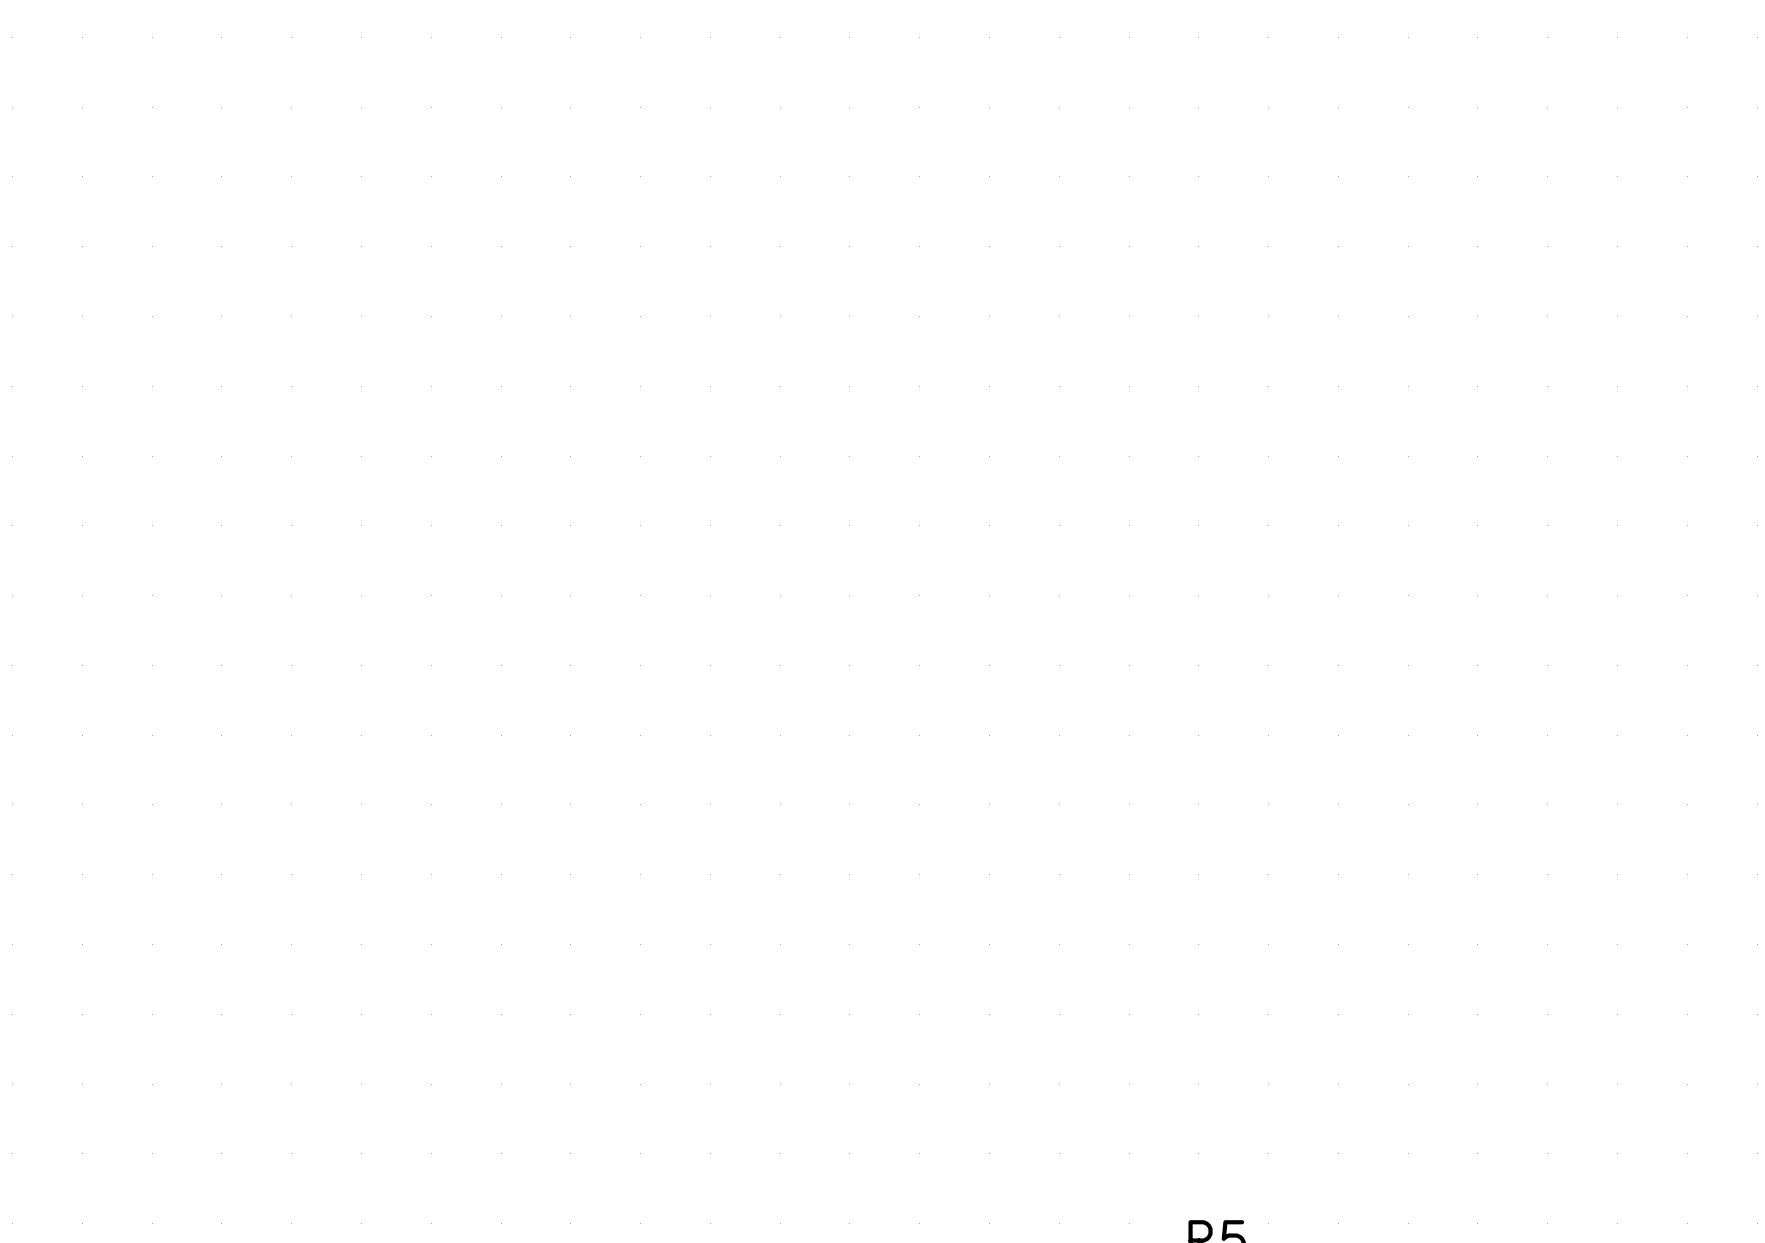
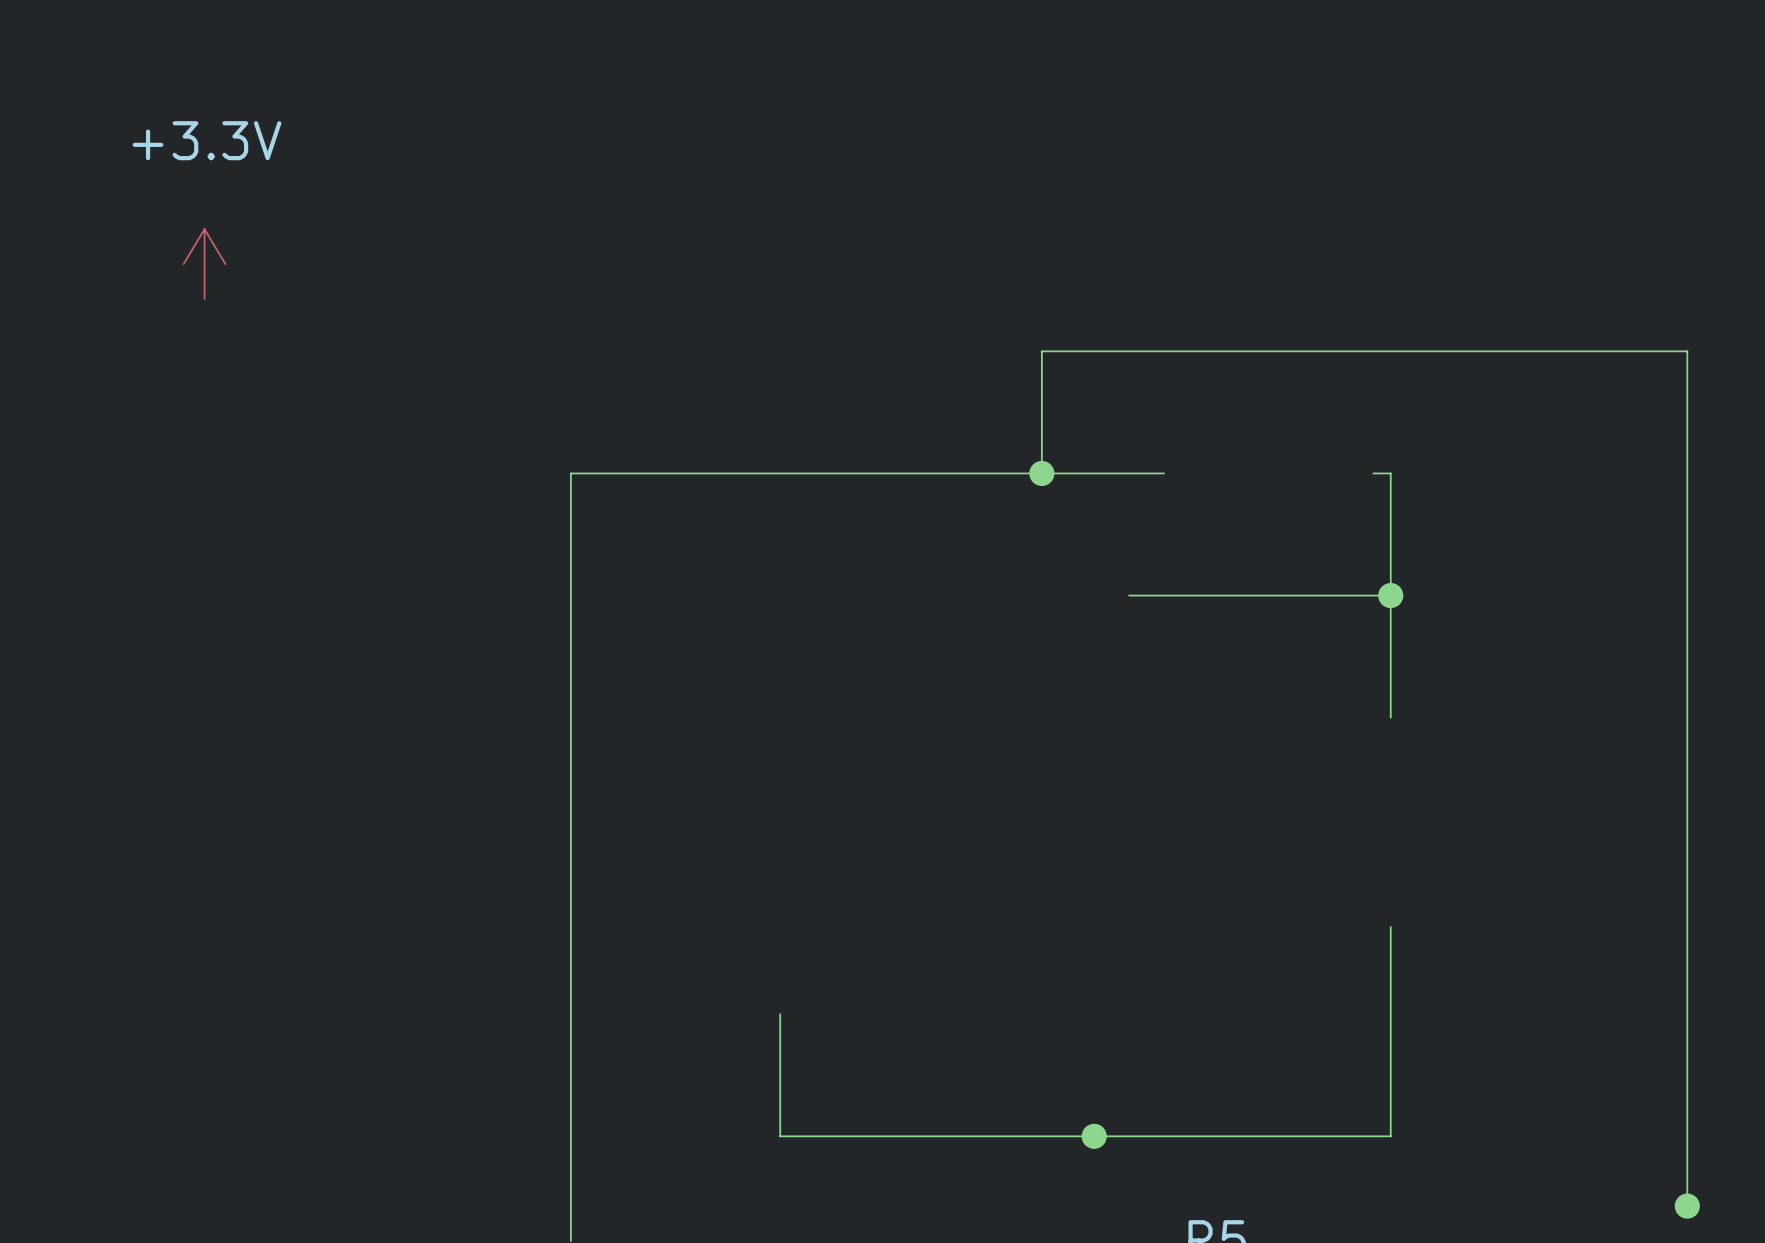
power symbol: none -> +3.3V (204, 264)
wire: none -> (1041, 473) (1041, 351) (1687, 351) (1687, 1206)
junction: none -> (1041, 473)
wire: none -> (1163, 473) (570, 473) (570, 1241)
wire: none -> (1373, 473) (1390, 473) (1390, 717)
wire: none -> (1129, 595) (1390, 595)
junction: none -> (1390, 595)
wire: none -> (1390, 927) (1390, 1136) (780, 1136) (780, 1014)
junction: none -> (1094, 1136)
junction: none -> (1687, 1206)

